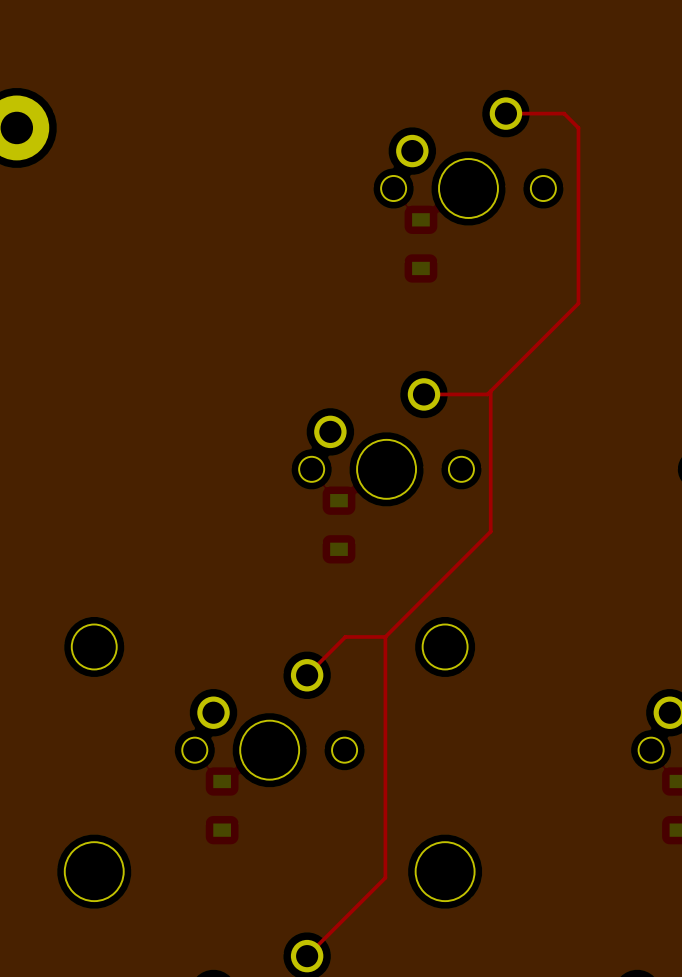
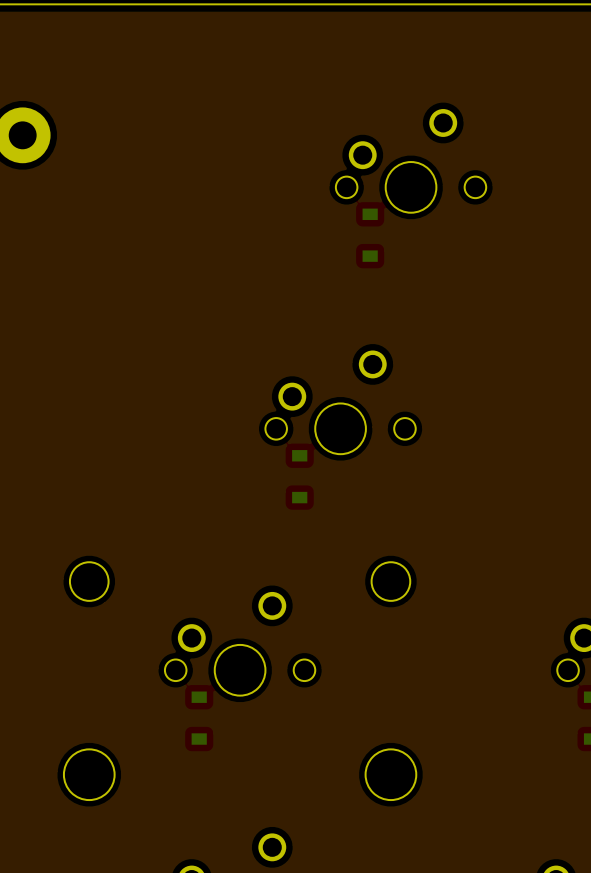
top track: (505, 113) (564, 113) (578, 127) (578, 303) (487, 394) (423, 394) -> none
top track: (490, 391) (490, 531) (385, 636) -> none
top track: (385, 636) (385, 877) (307, 956) -> none
top track: (385, 636) (345, 636) (307, 675) -> none

